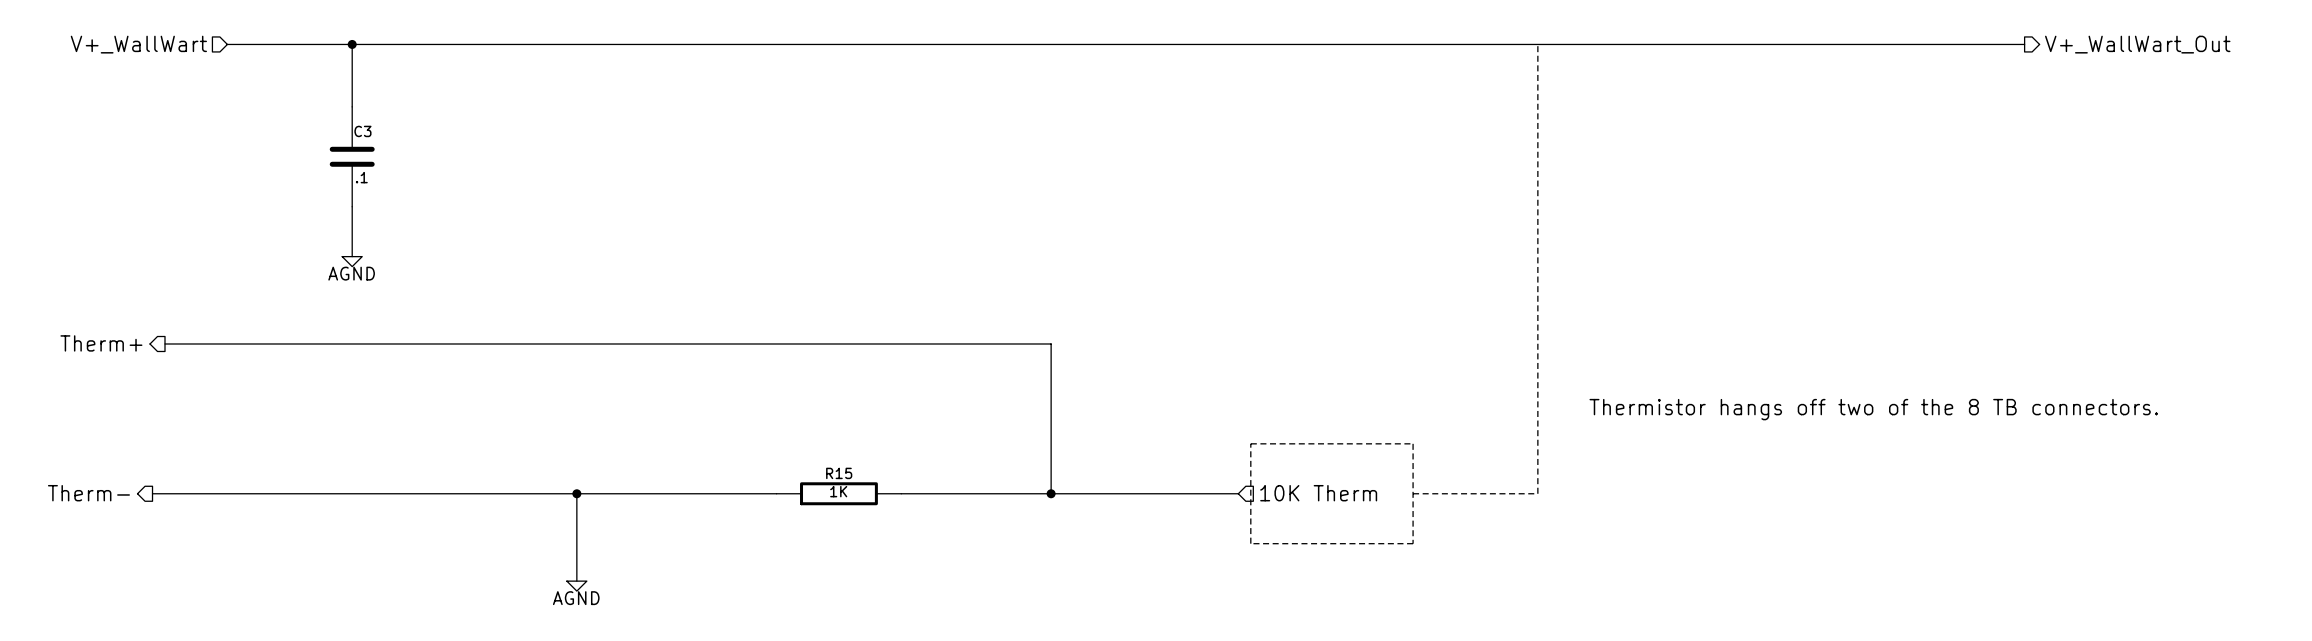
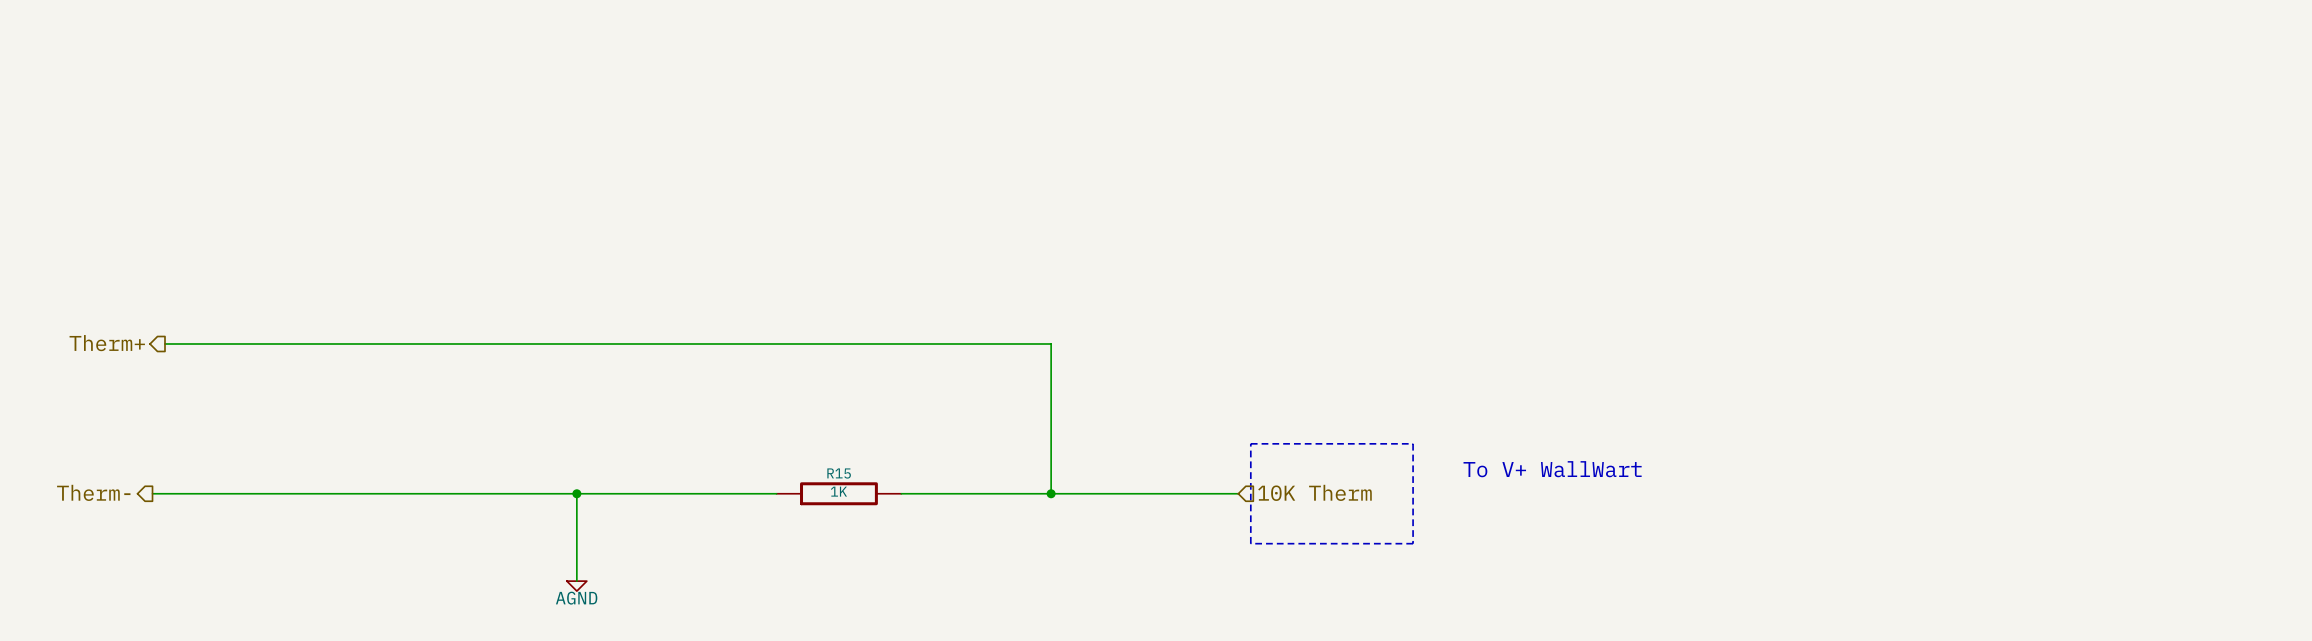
hierarchical label: V+_WallWart (138, 44) -> none
wire: (227, 44) (2024, 44) -> none
wire: (352, 44) (352, 106) -> none
junction: (352, 44) -> none
line: (1537, 44) (1537, 493) (1413, 493) -> none
hierarchical label: V+_WallWart_Out (2137, 44) -> none
C3: .1 (352, 156) -> none
wire: (352, 206) (352, 256) -> none
power symbol: AGND (352, 261) -> none
text: Thermistor hangs off two of the 8 TB connectors. (1873, 409) -> none
text: none -> To V+ WallWart (1552, 469)

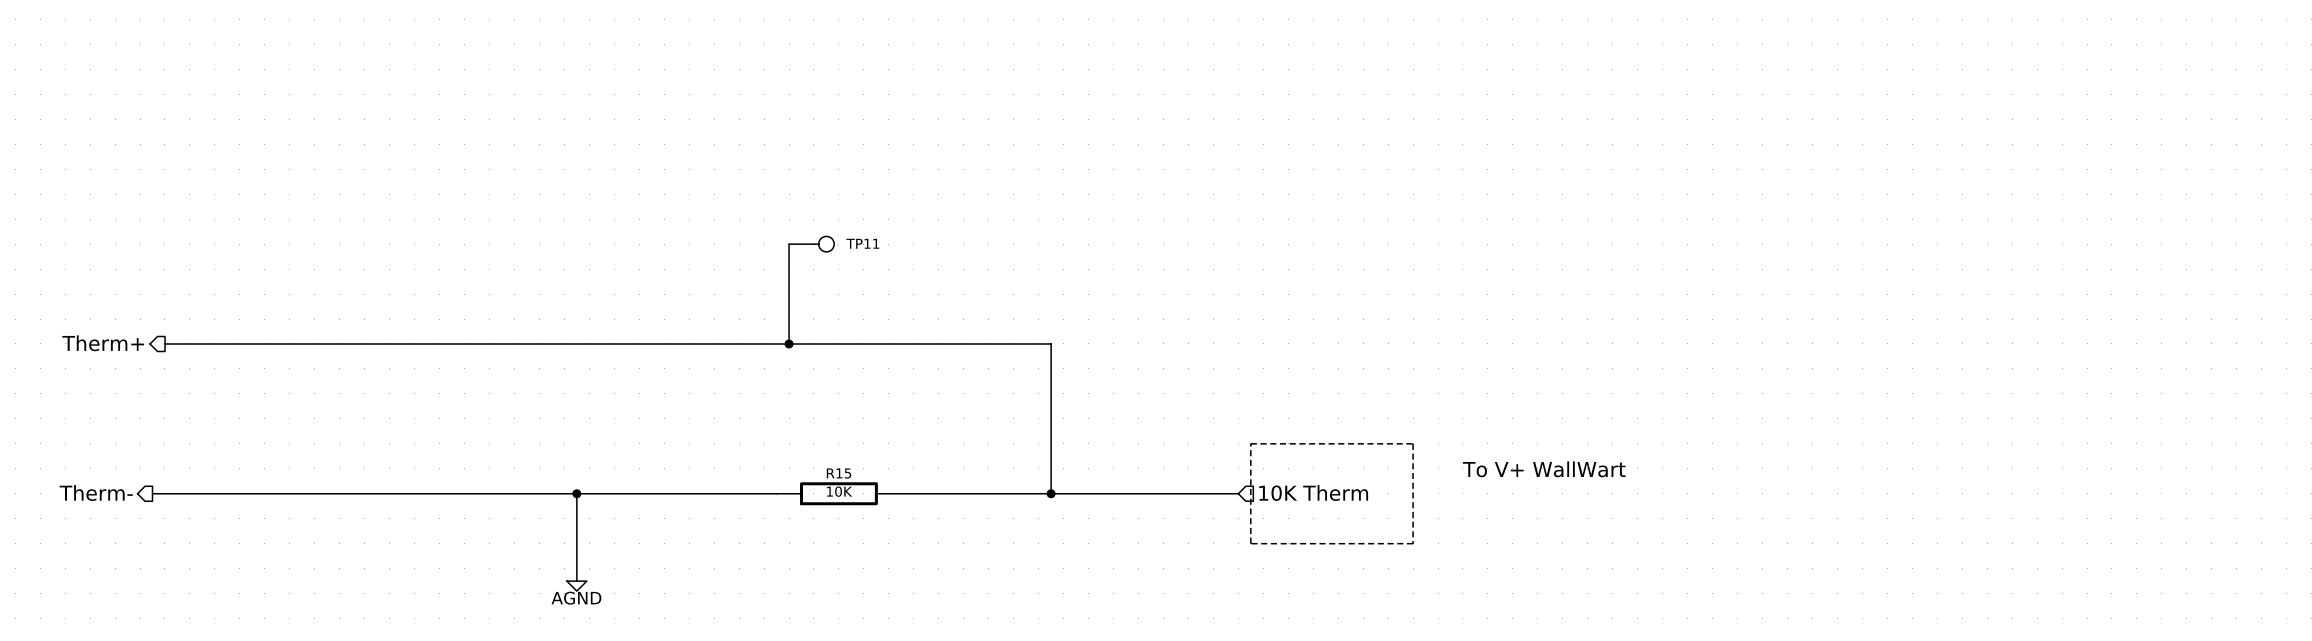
wire: none -> (789, 244) (789, 343)
TP11: none -> (811, 244)
junction: none -> (789, 343)
R15 value: 1K (838, 491) -> 10K (839, 491)

